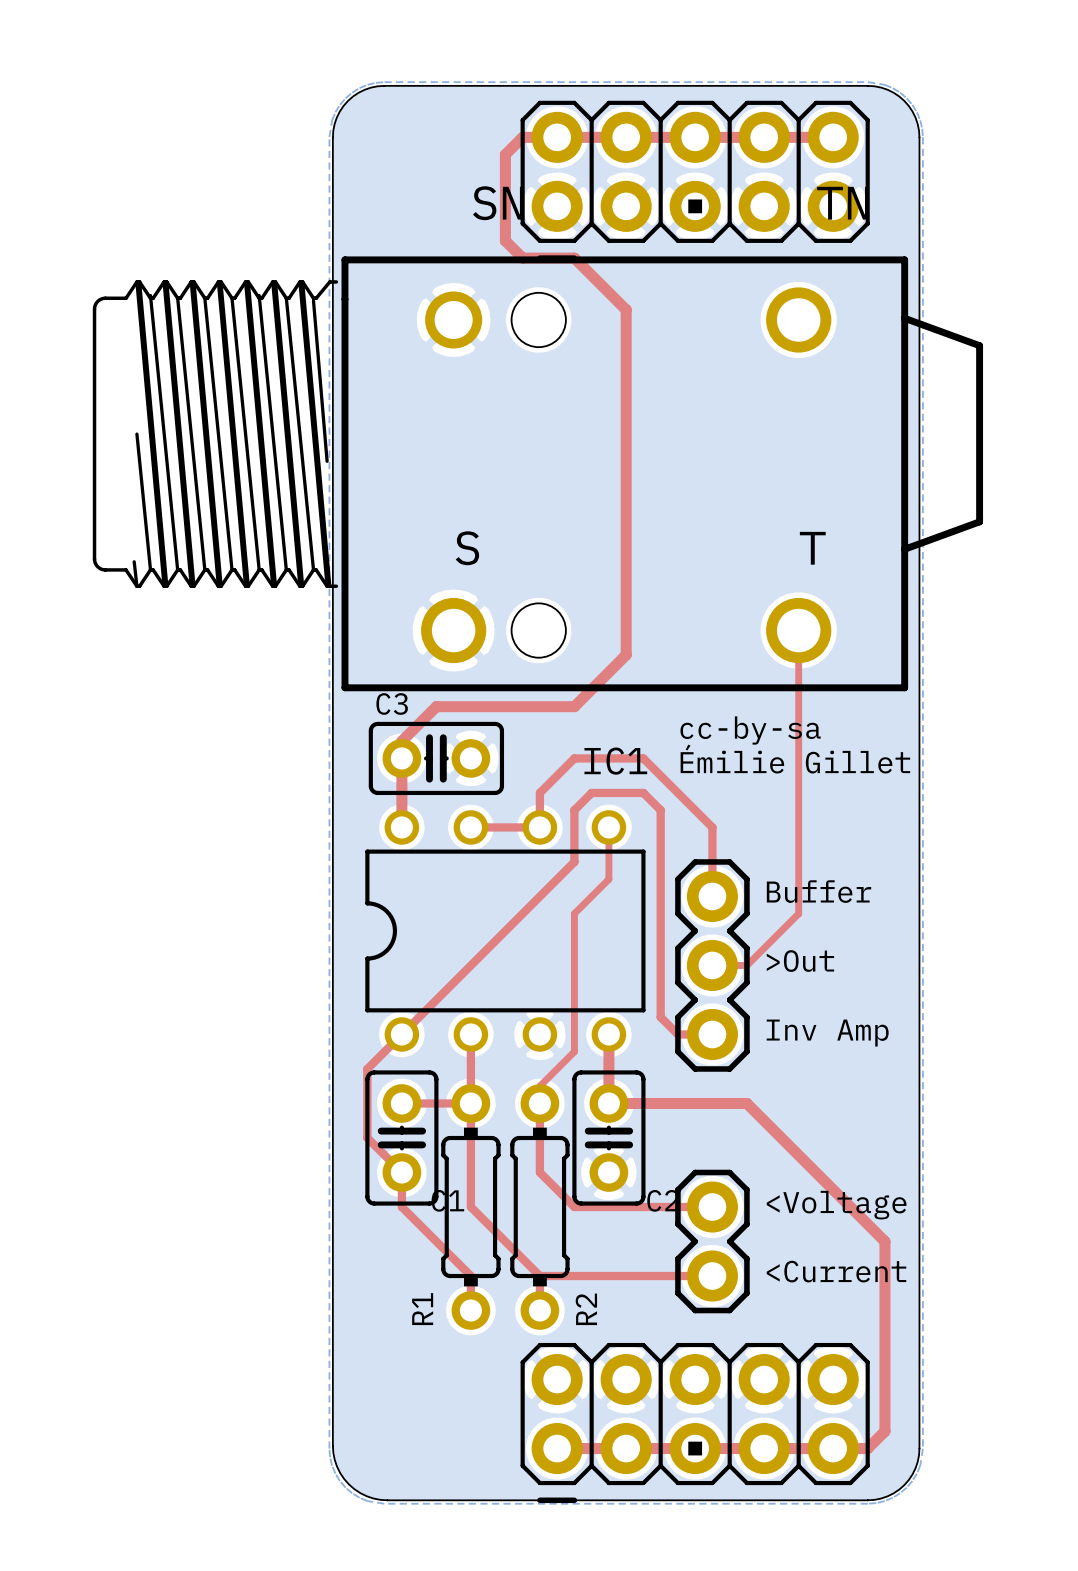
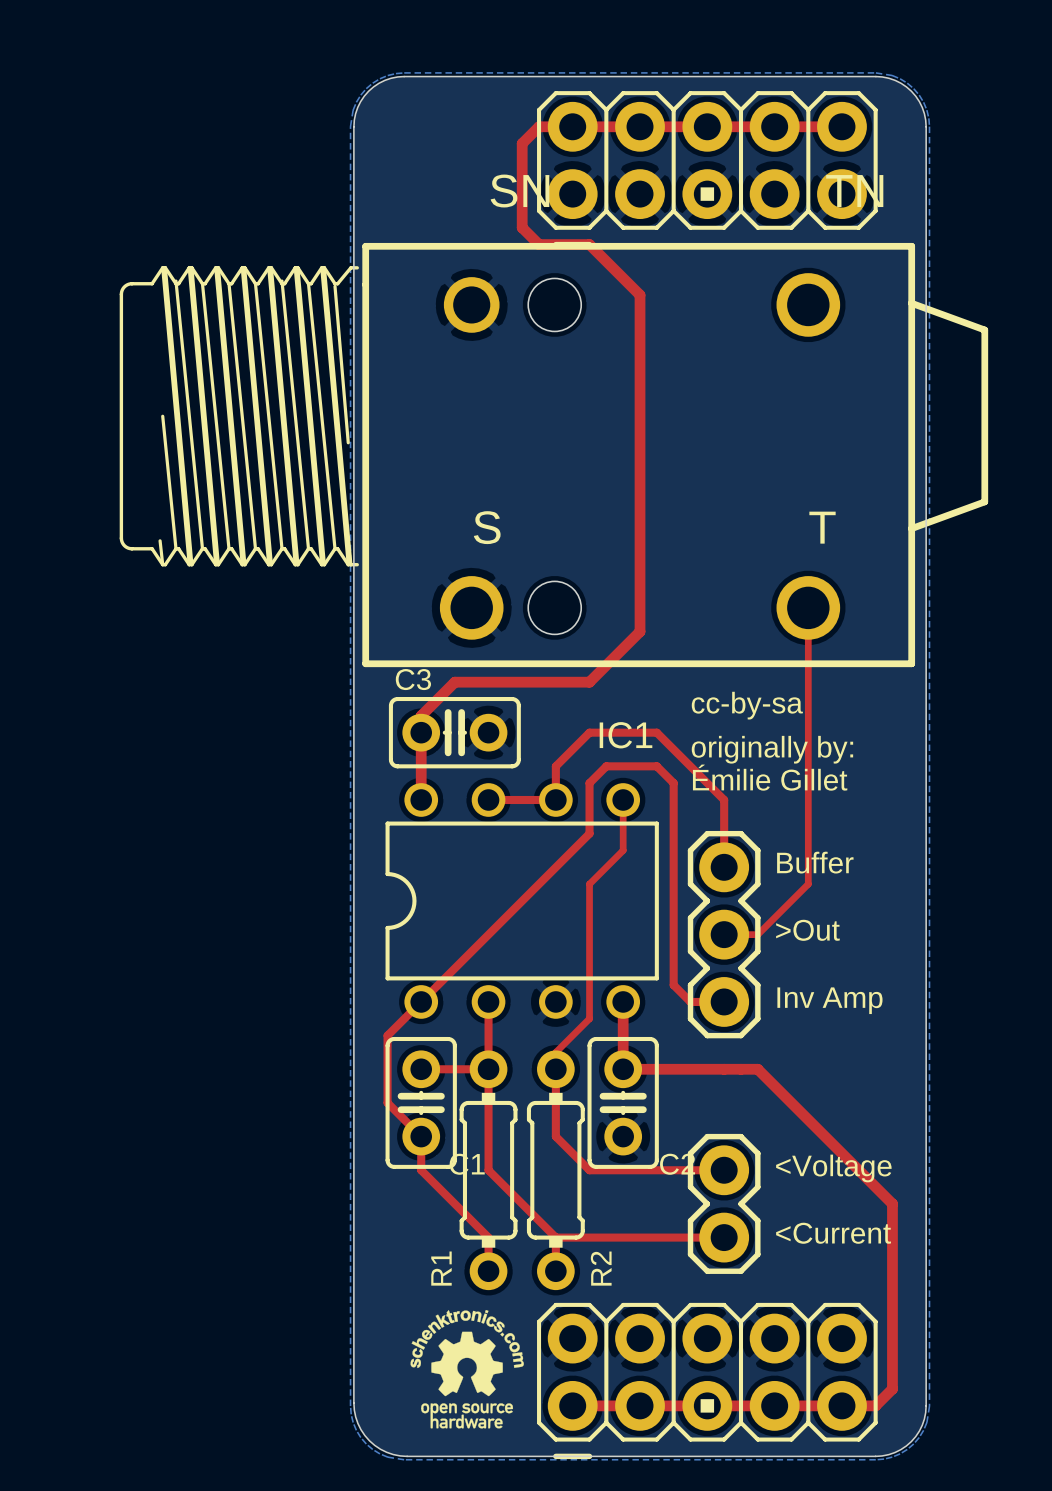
text: Émilie Gillet (795, 759) -> originally by: (772, 749)
text: none -> Émilie Gillet (770, 777)
drawing: none -> [410, 1309, 524, 1429]

